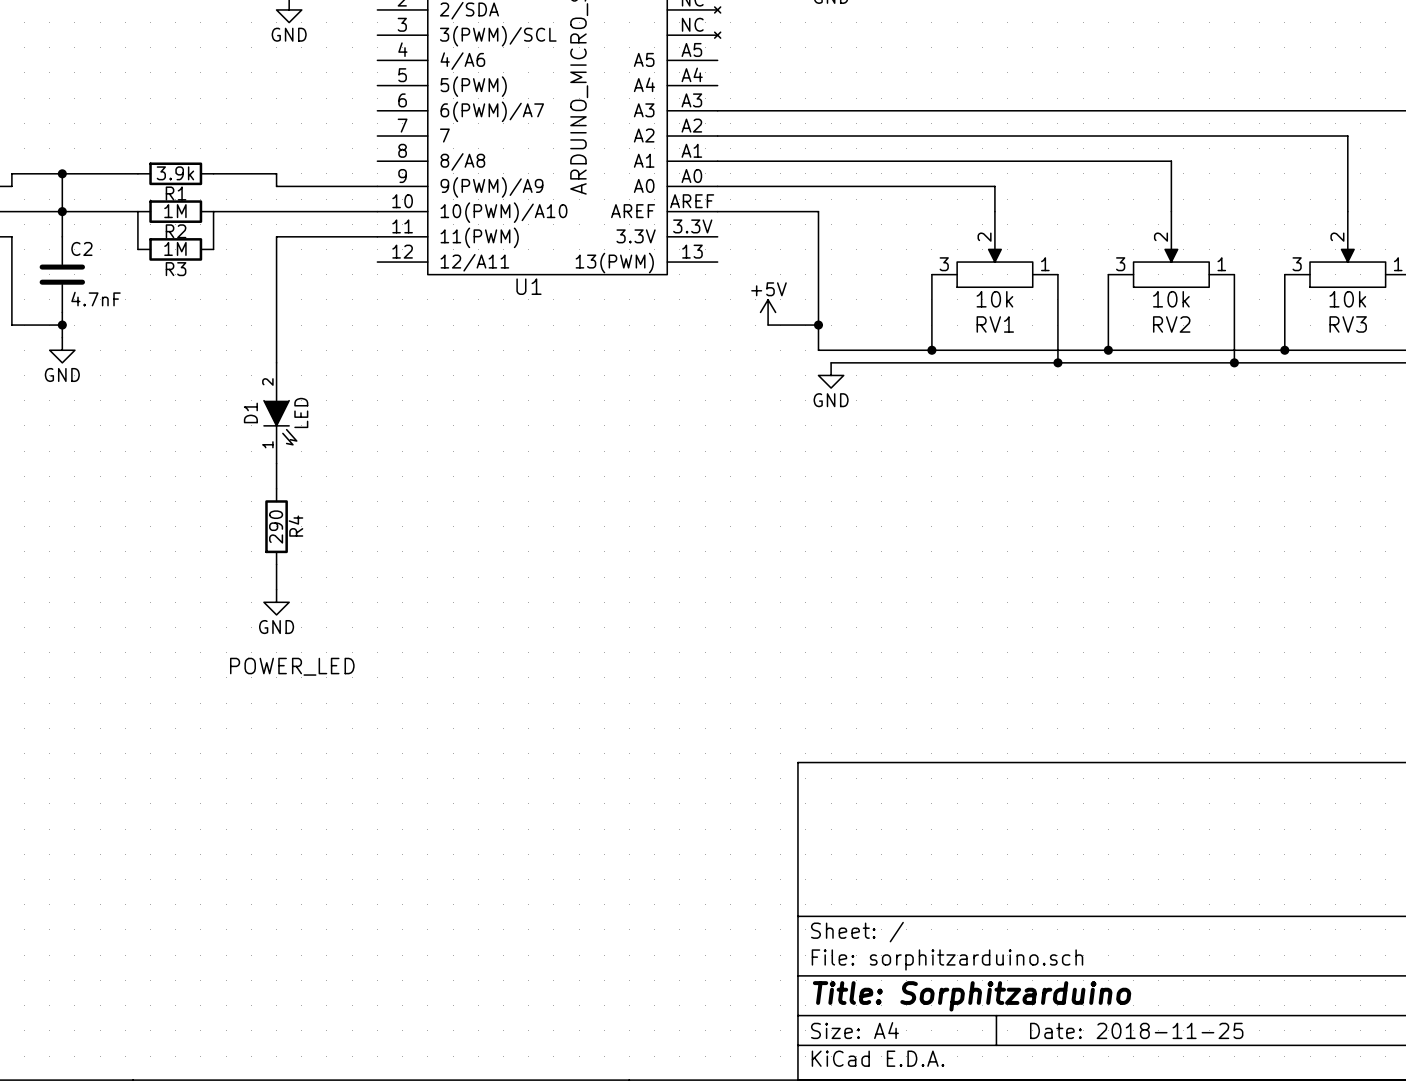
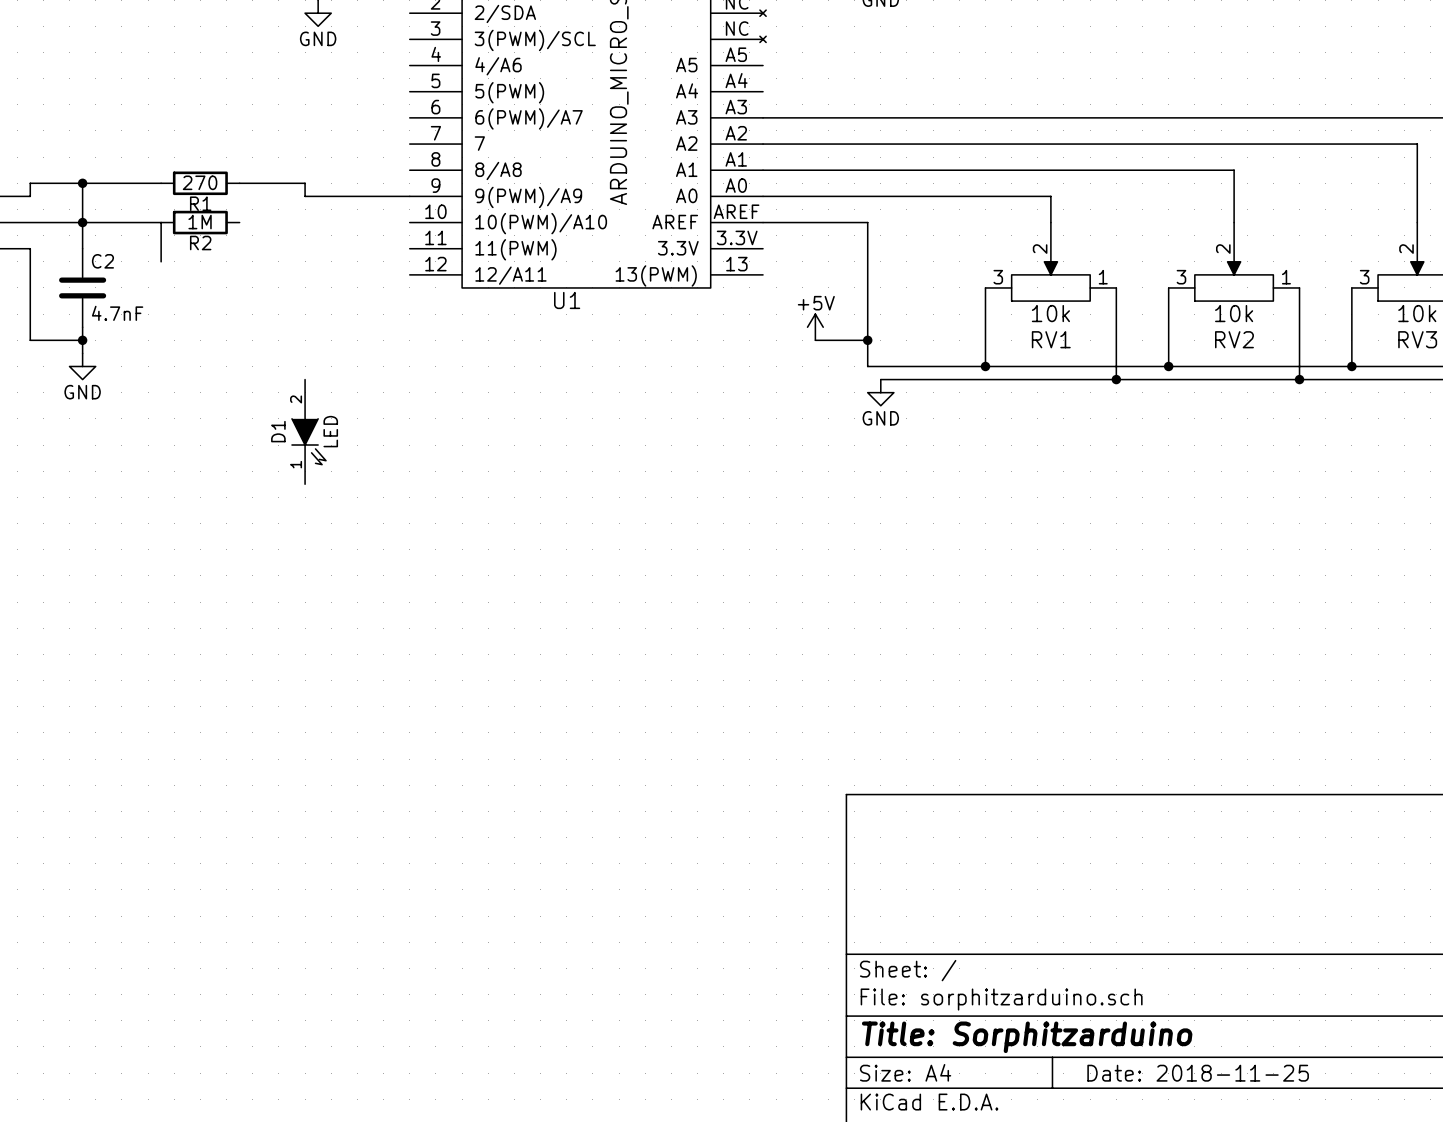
R1 value: 3.9k (175, 173) -> 270 (200, 182)
wire: (377, 211) (213, 211) (213, 249) -> none
wire: (377, 236) (276, 236) (276, 362) -> none
R3: 1M (175, 249) -> none
wire: (276, 463) (276, 488) -> none
R4: 290 (276, 526) -> none
wire: (276, 564) (276, 589) -> none
power symbol: GND (276, 602) -> none
text: POWER_LED (292, 666) -> none

